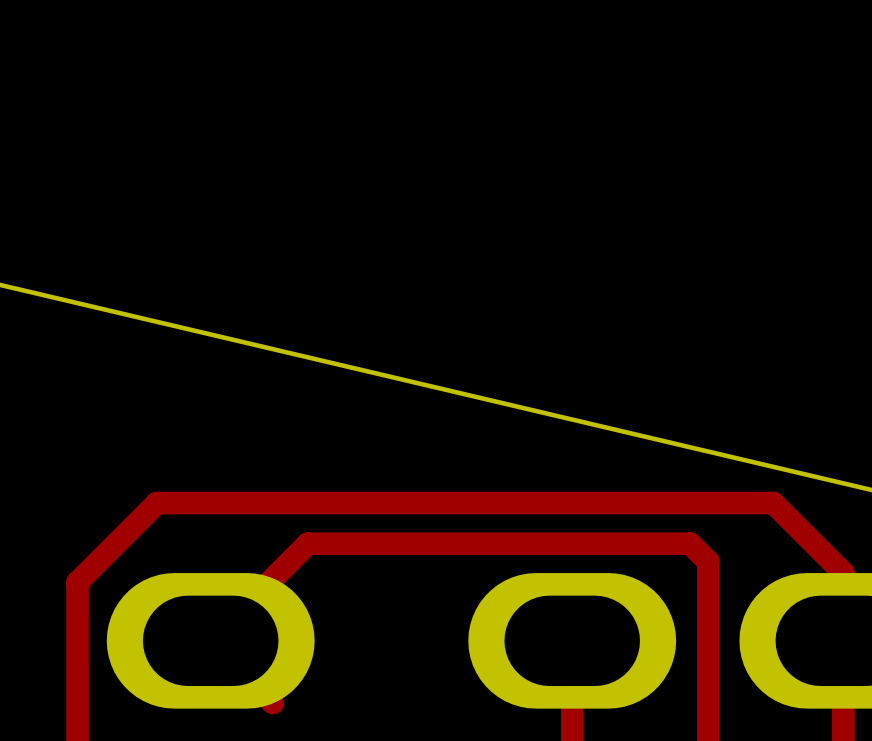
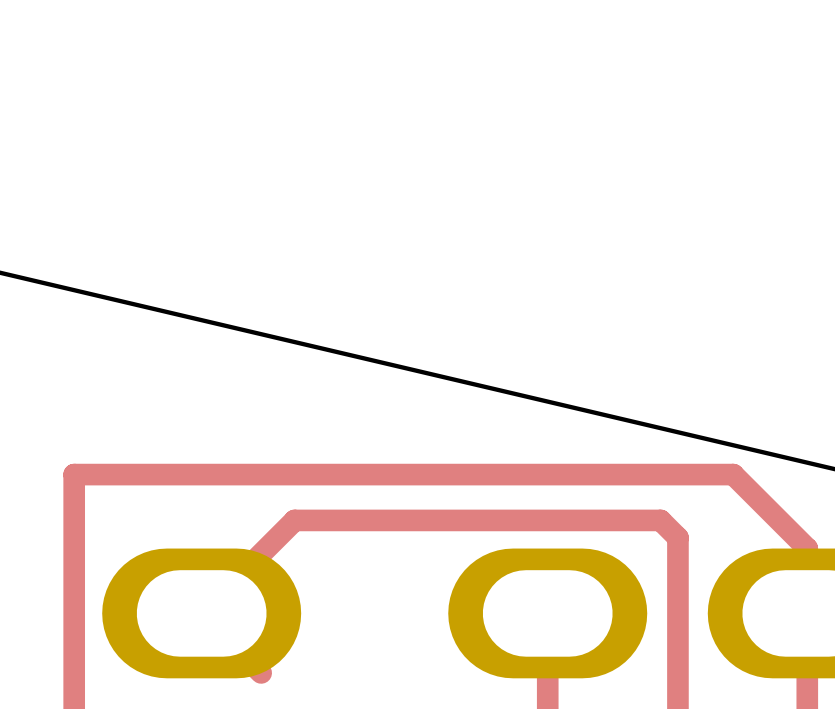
track: (773, 503) (156, 503) (77, 582) -> (740, 481) (733, 474) (74, 474) (74, 557)

